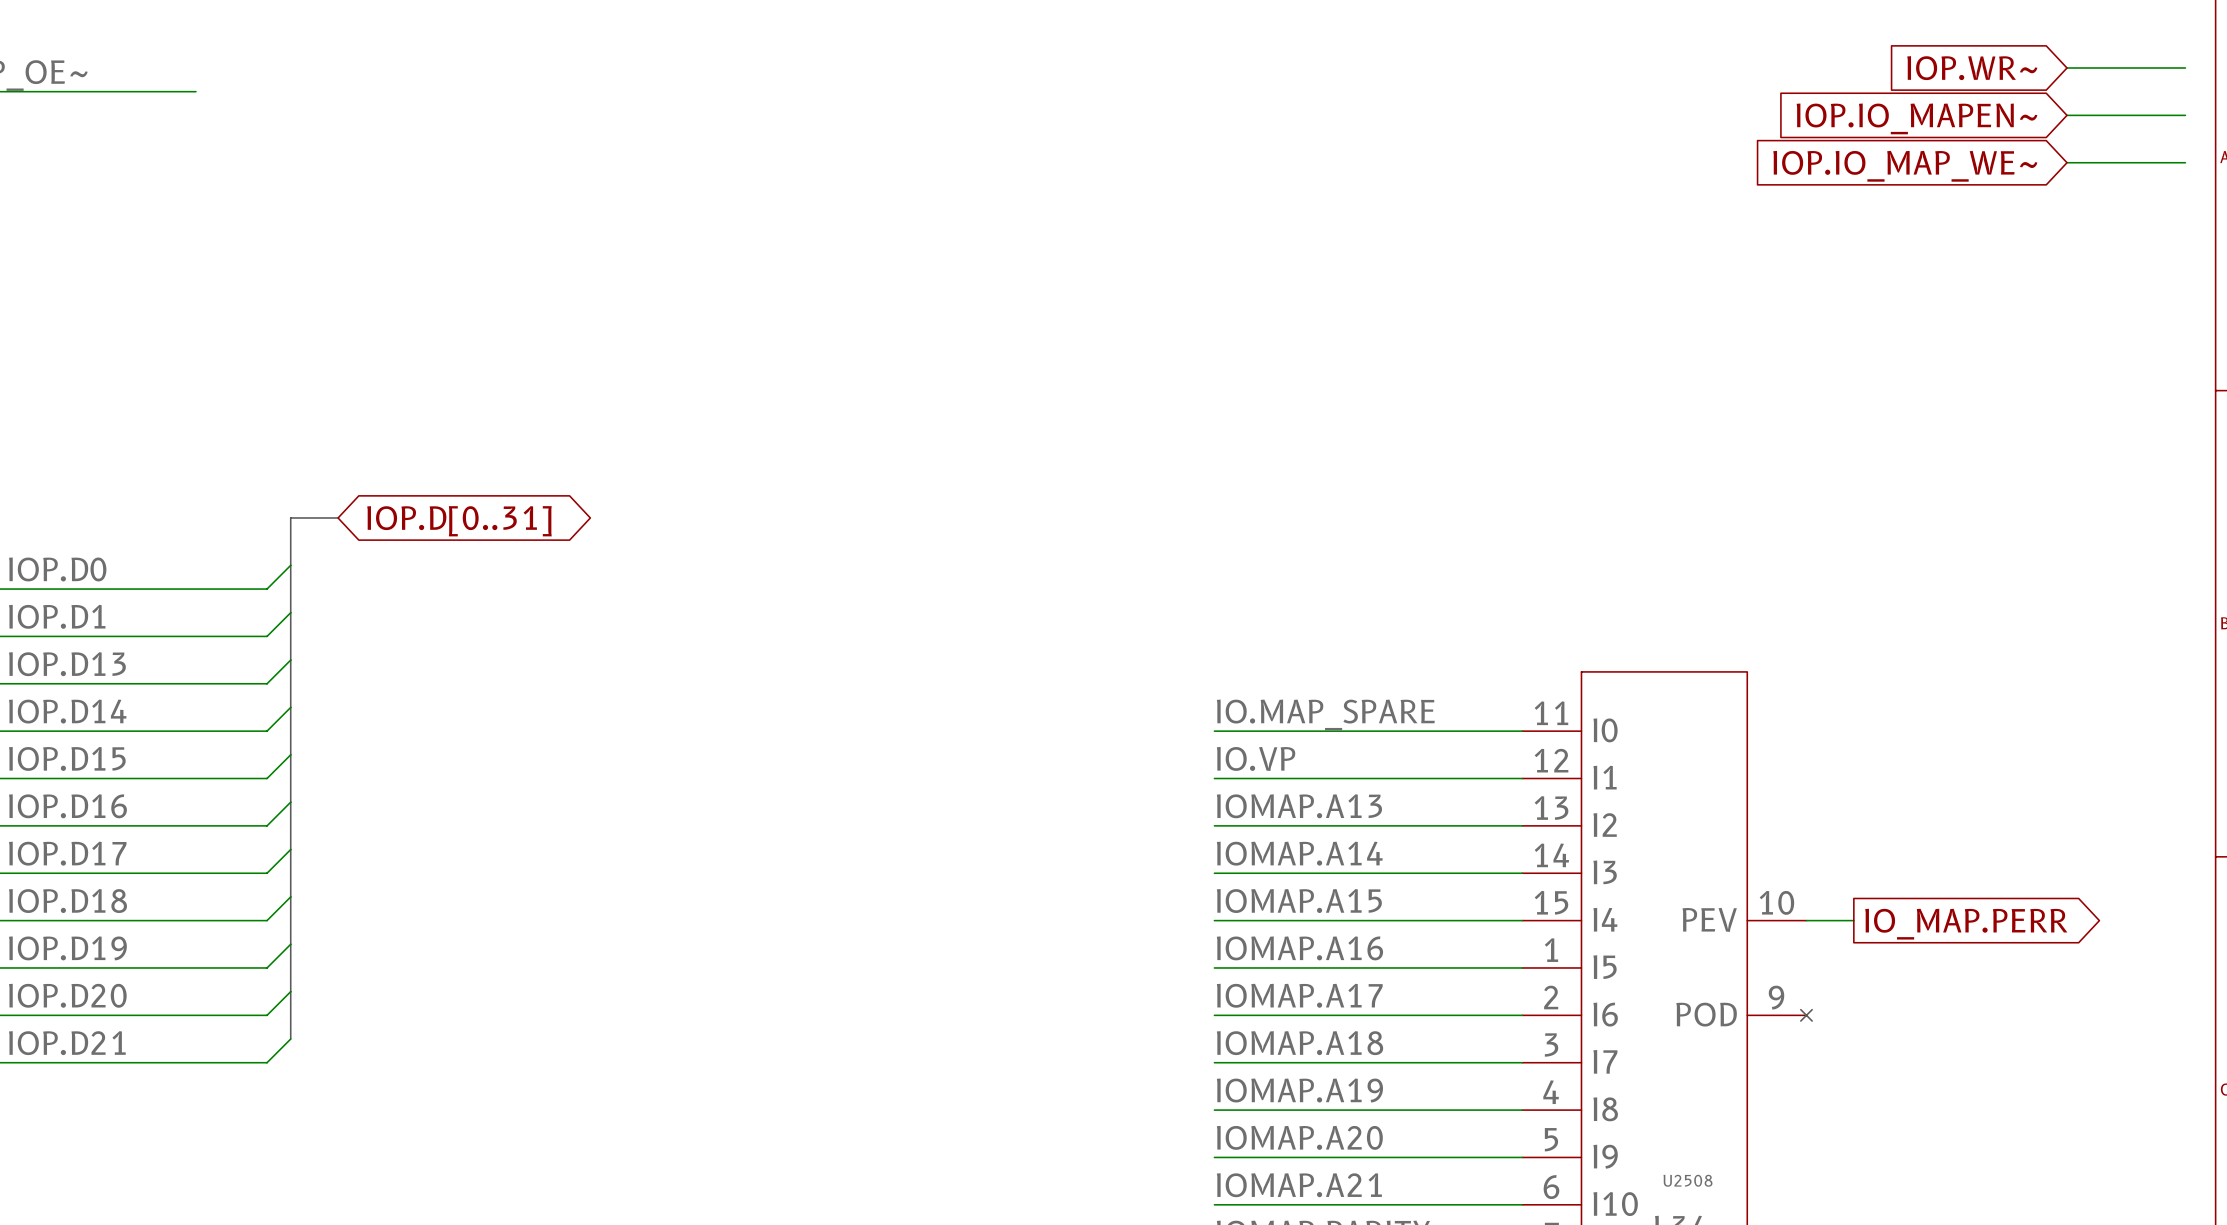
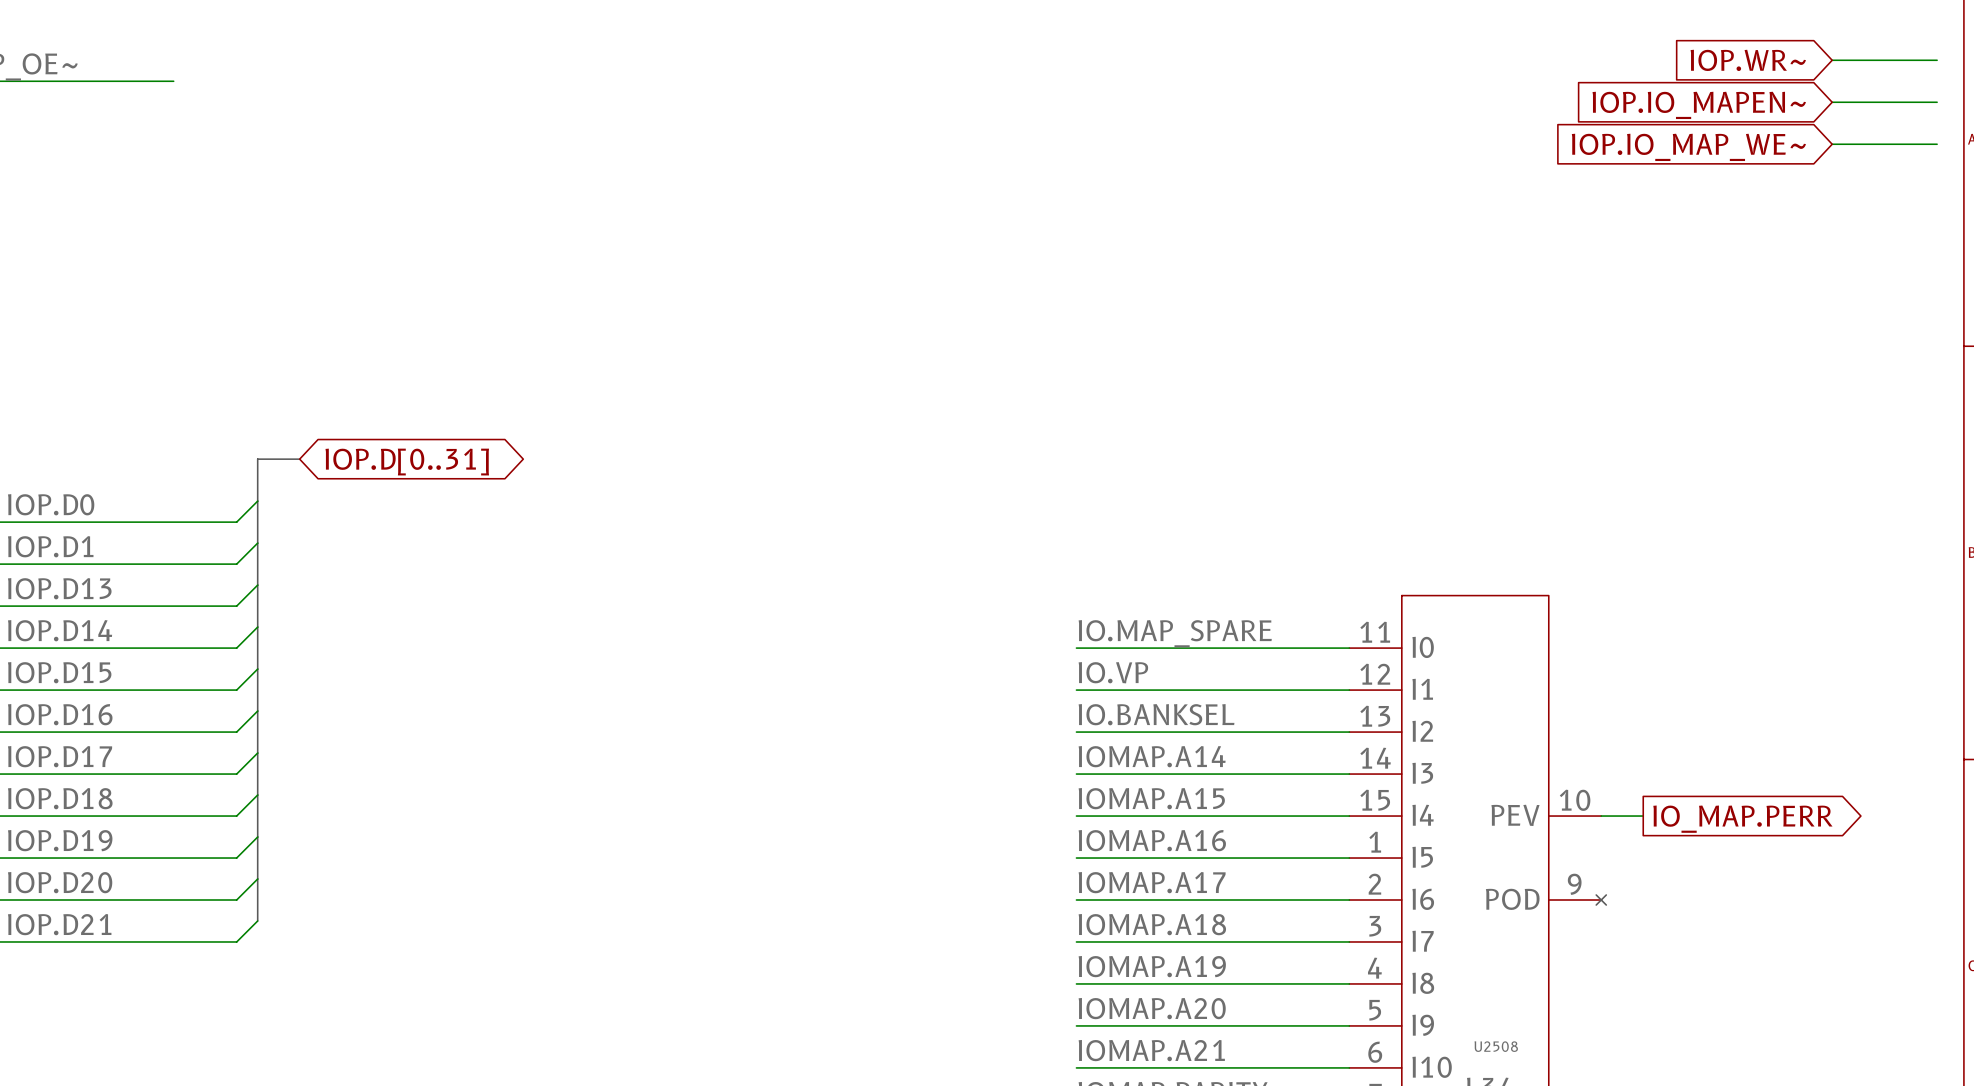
label: IOMAP.A13 (1299, 806) -> IO.BANKSEL (1156, 714)

